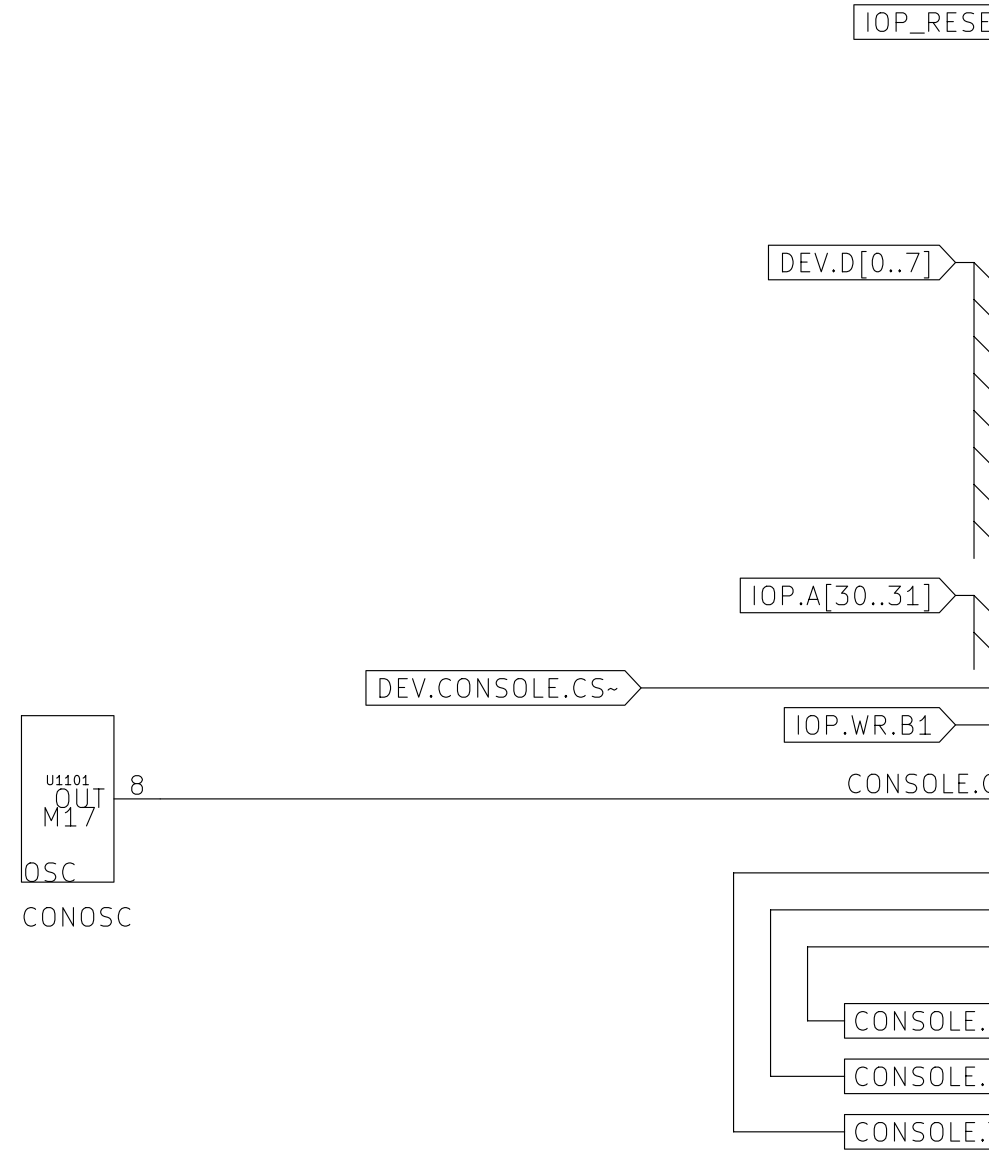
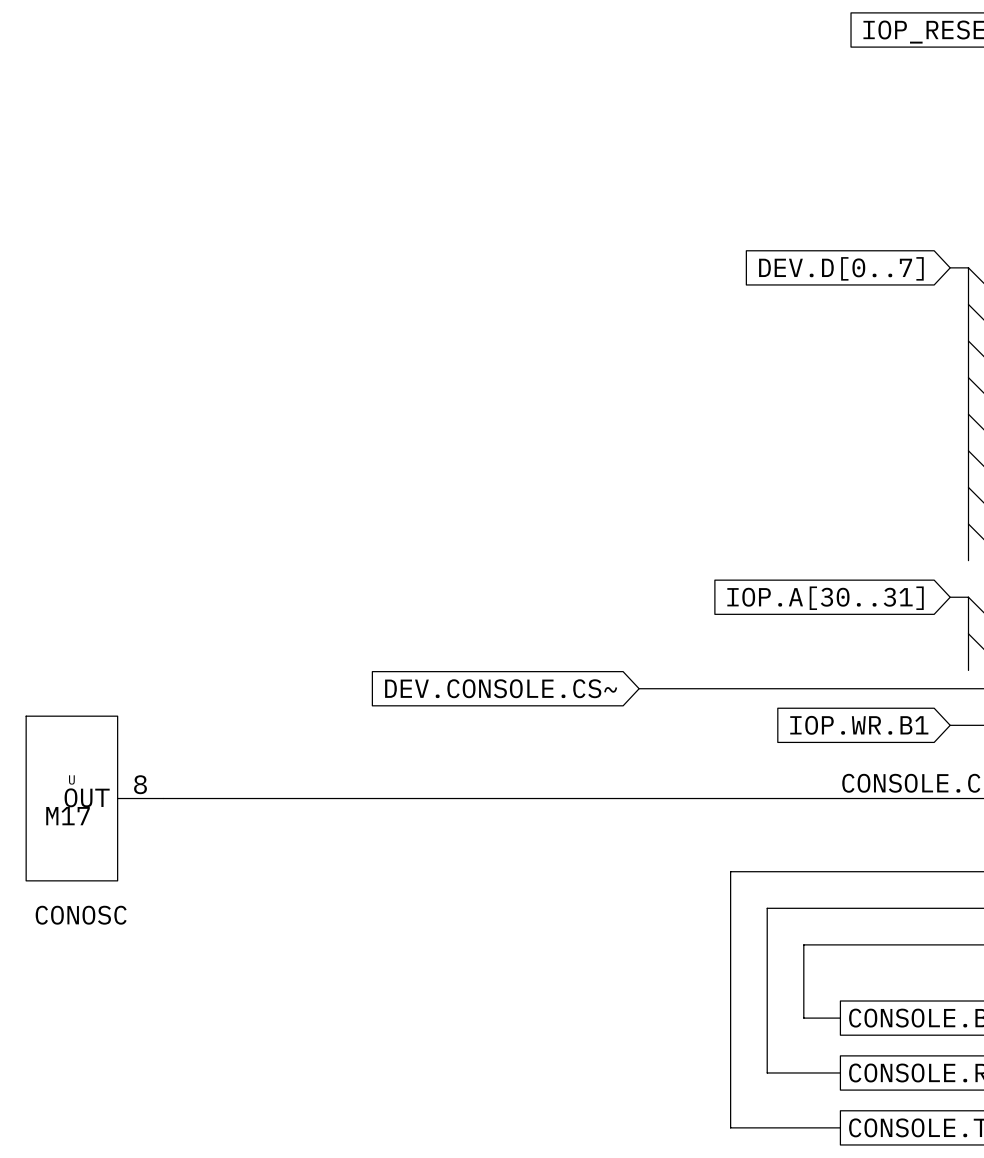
U1101 name: U1101 (67, 780) -> U (71, 779)
U1101 value: OSC (49, 872) -> none

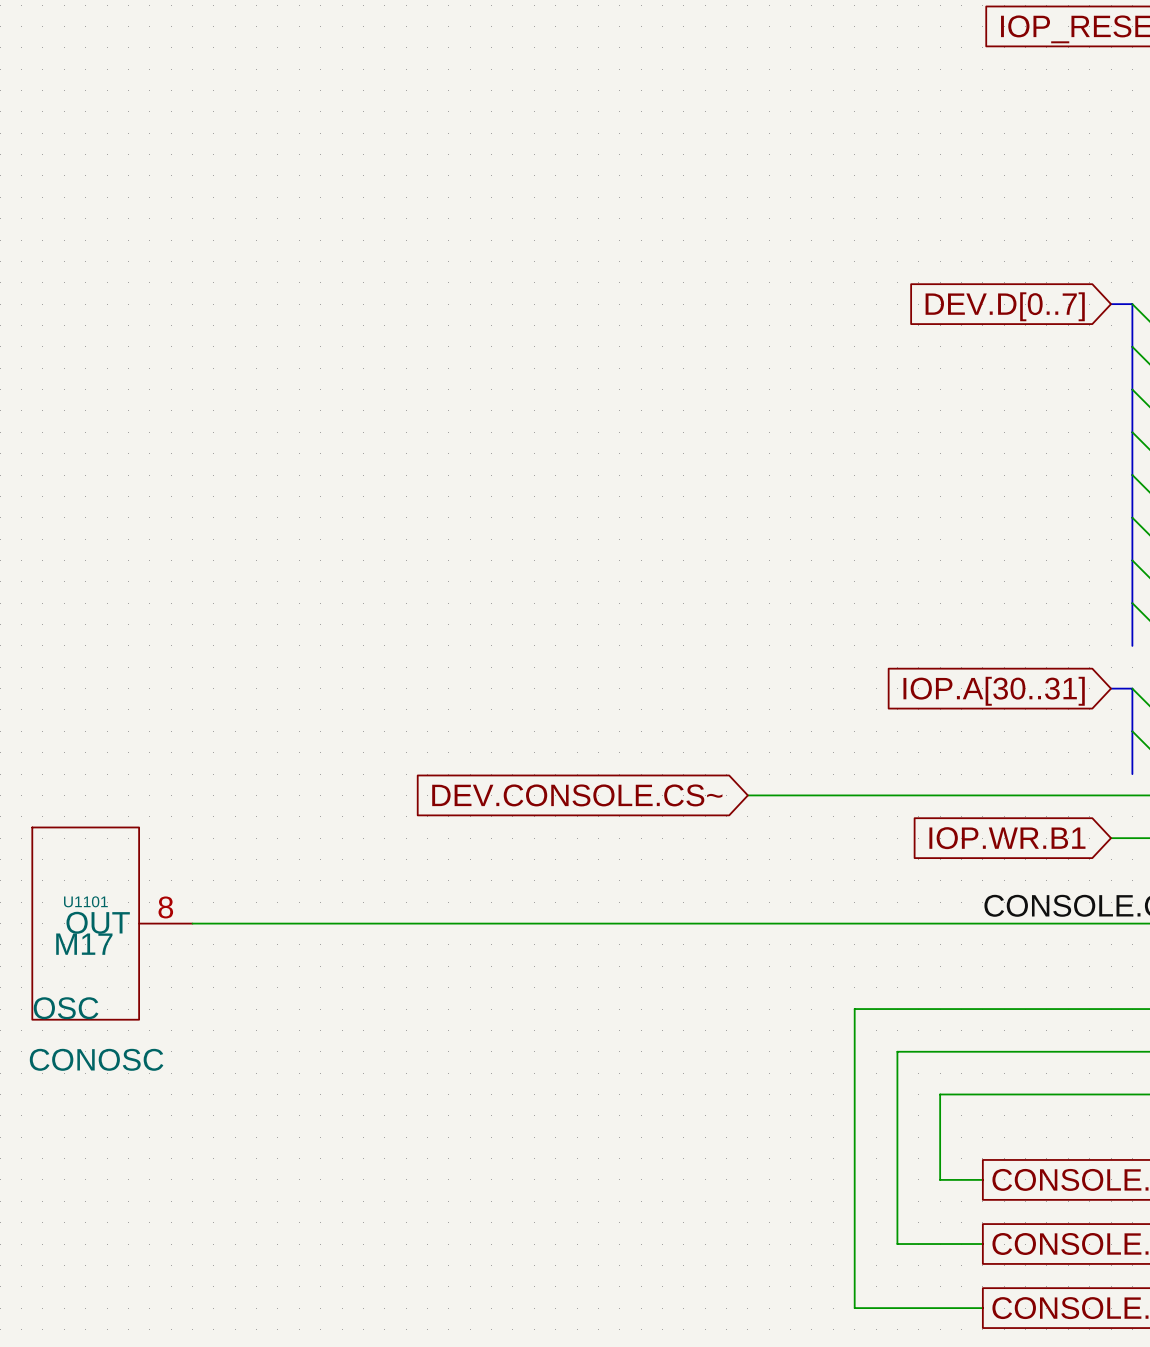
U name: U (71, 779) -> U1101 (85, 901)
U value: none -> OSC (66, 1008)

